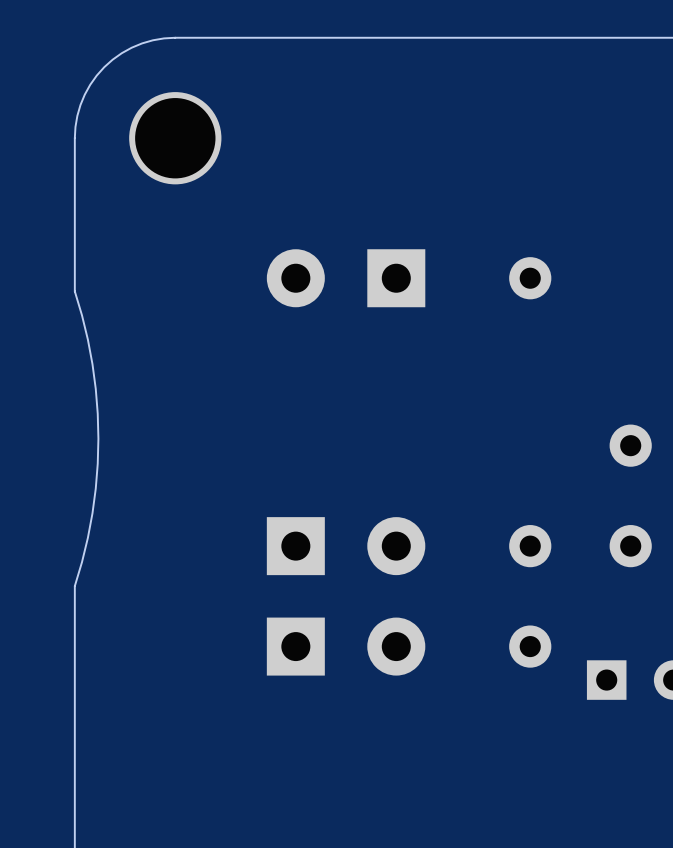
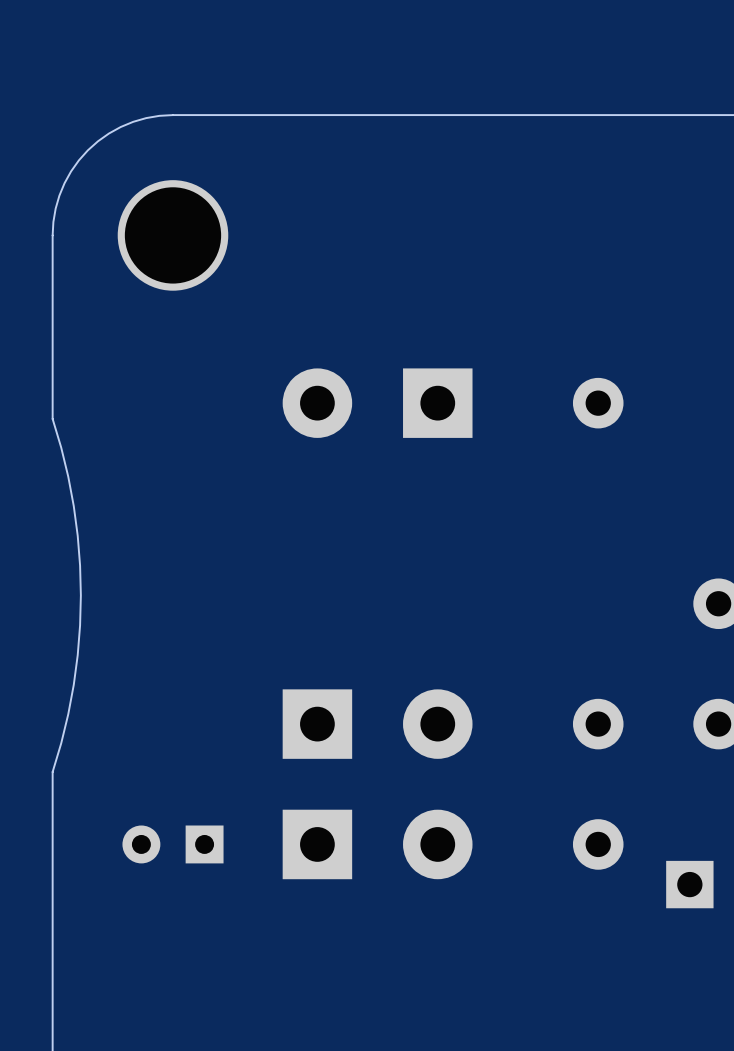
part: none -> (172, 844)

